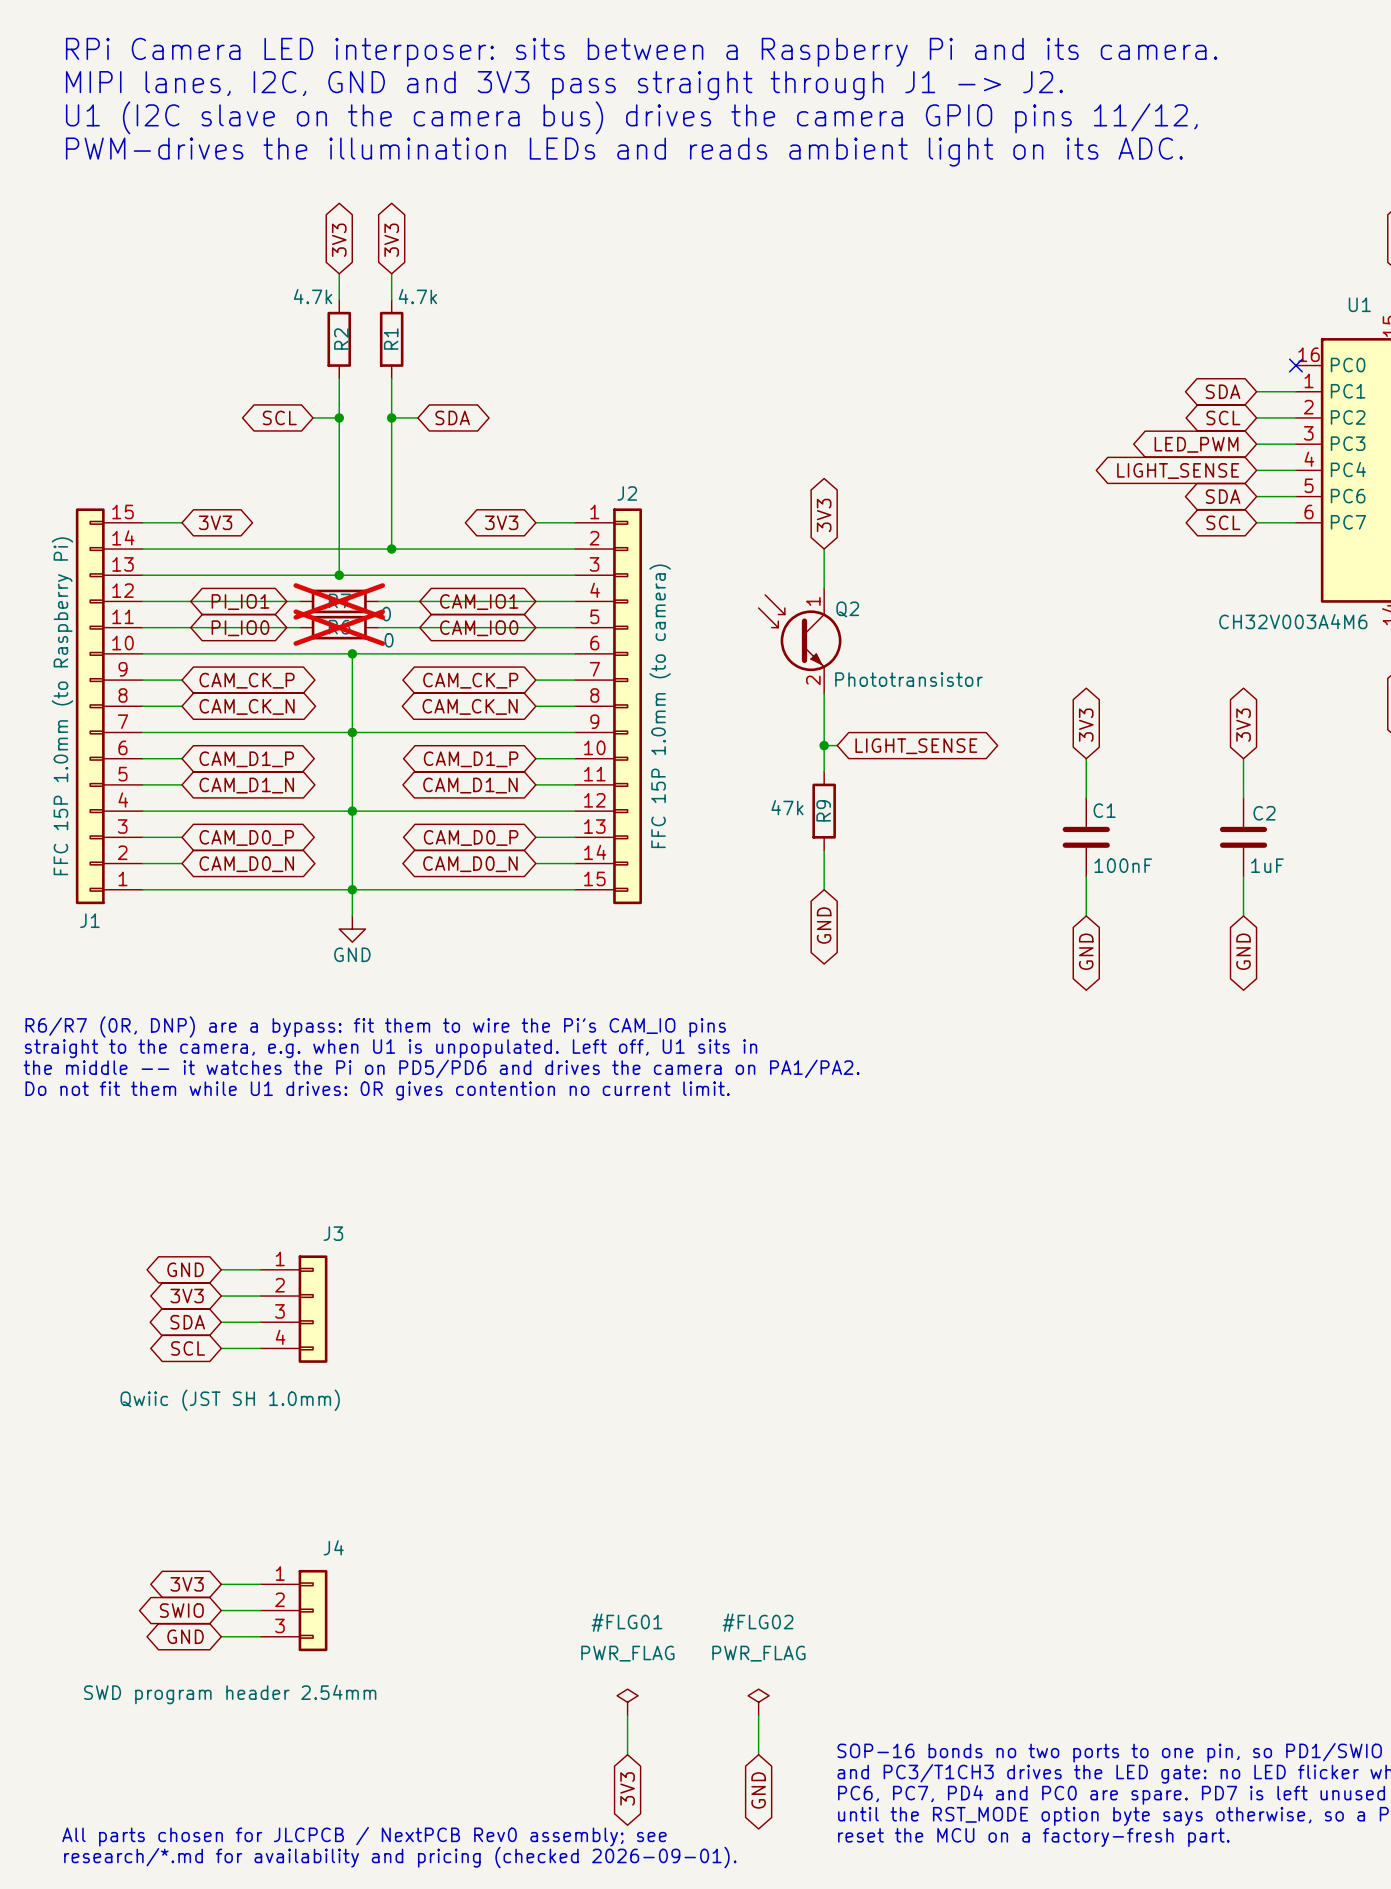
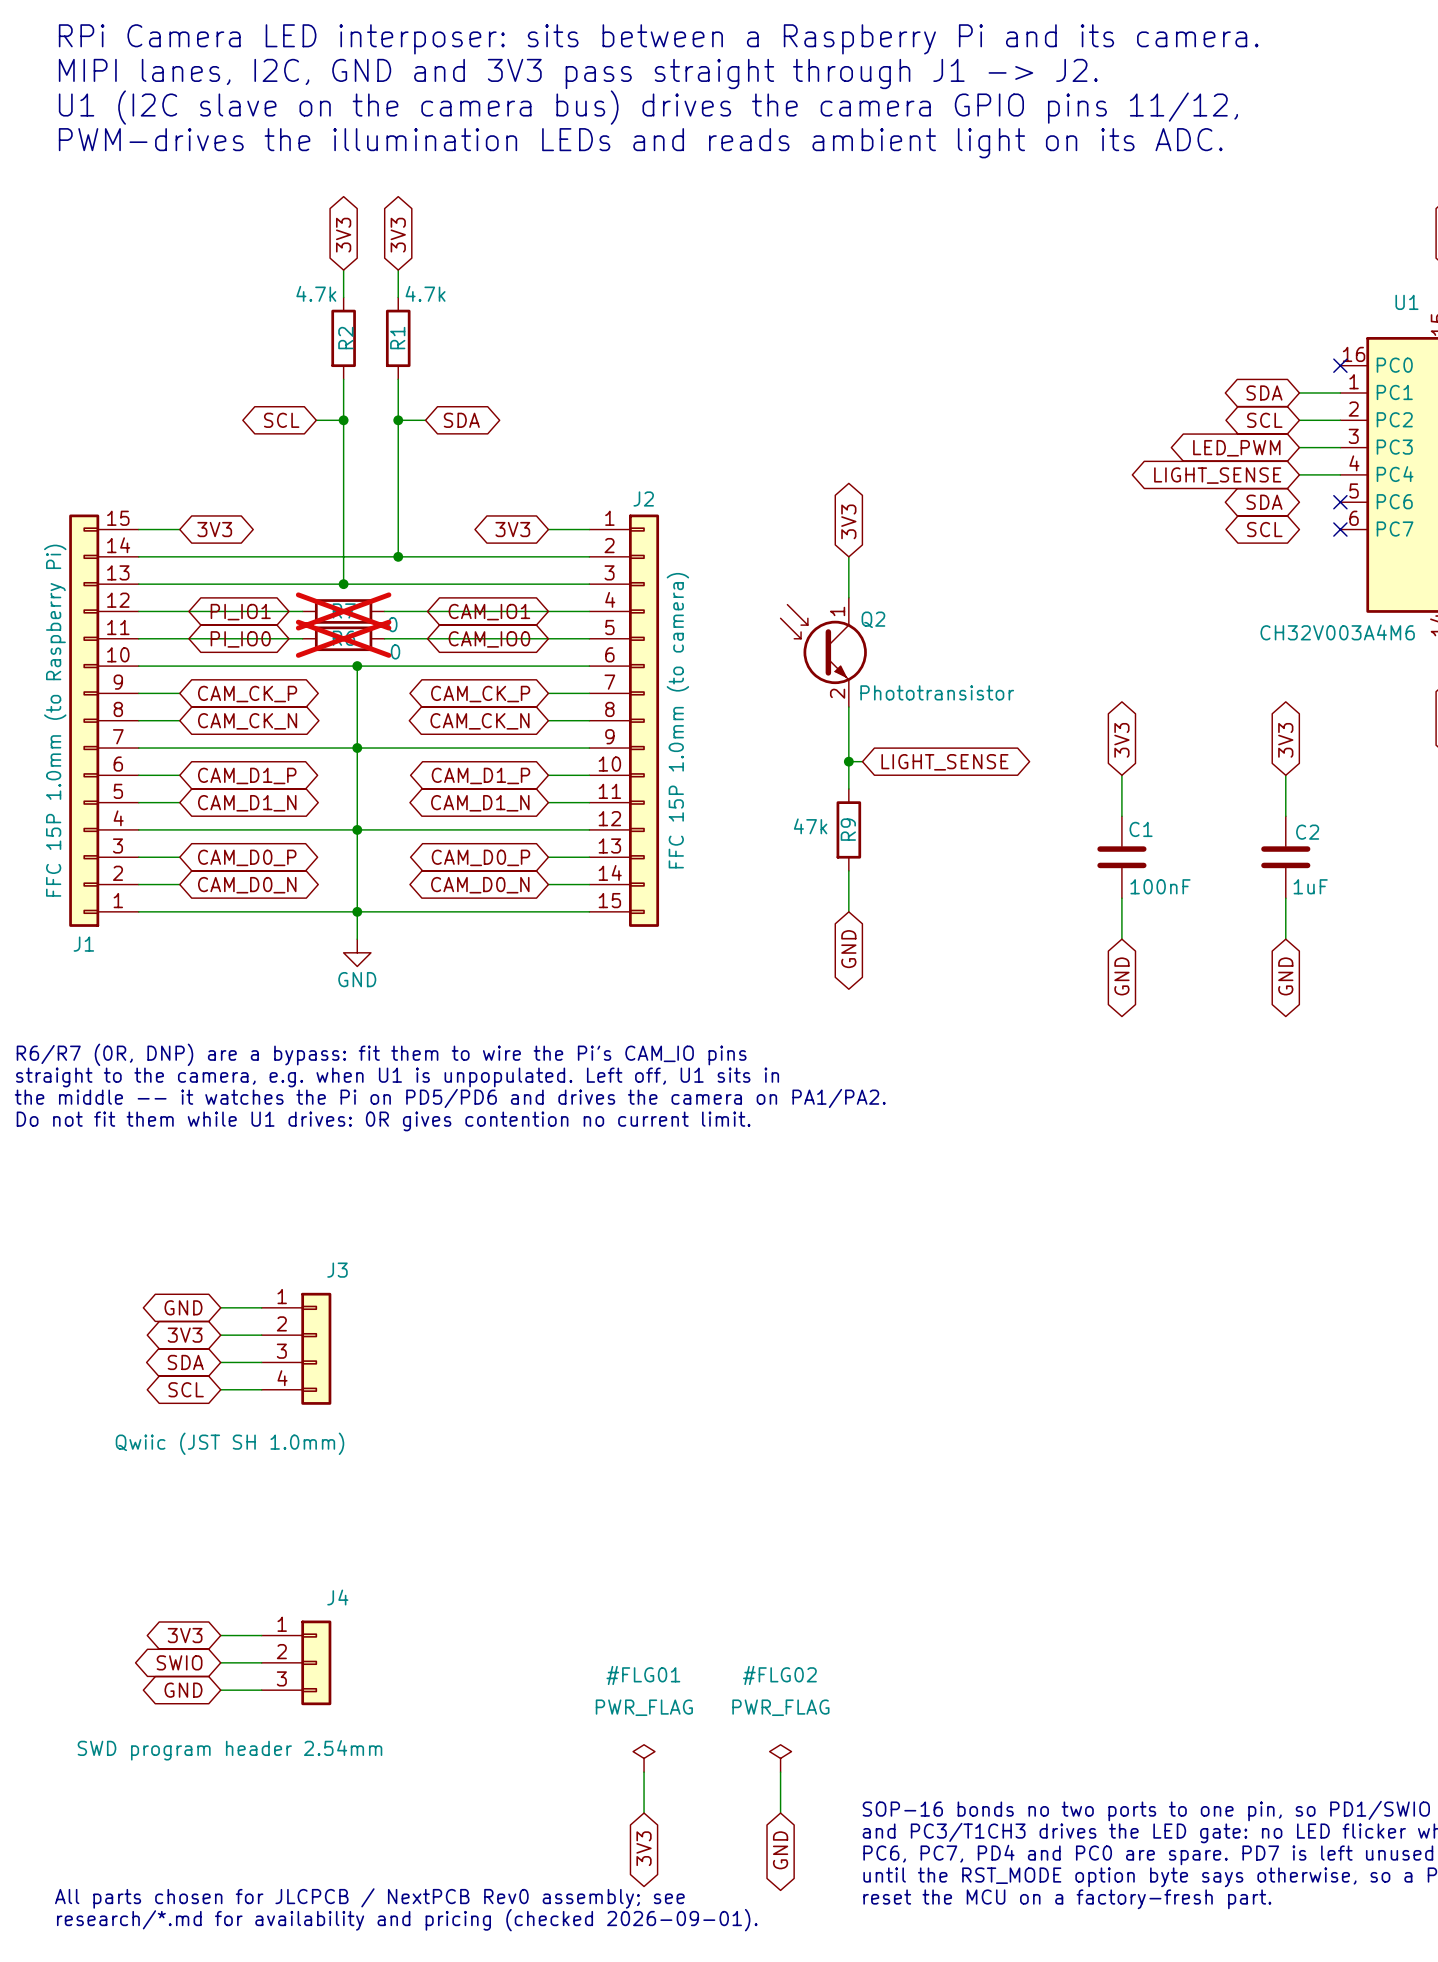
wire: (1256, 496) (1295, 496) -> none
no-connect mark: none -> (1340, 502)
wire: (1256, 522) (1295, 522) -> none
no-connect mark: none -> (1340, 529)

